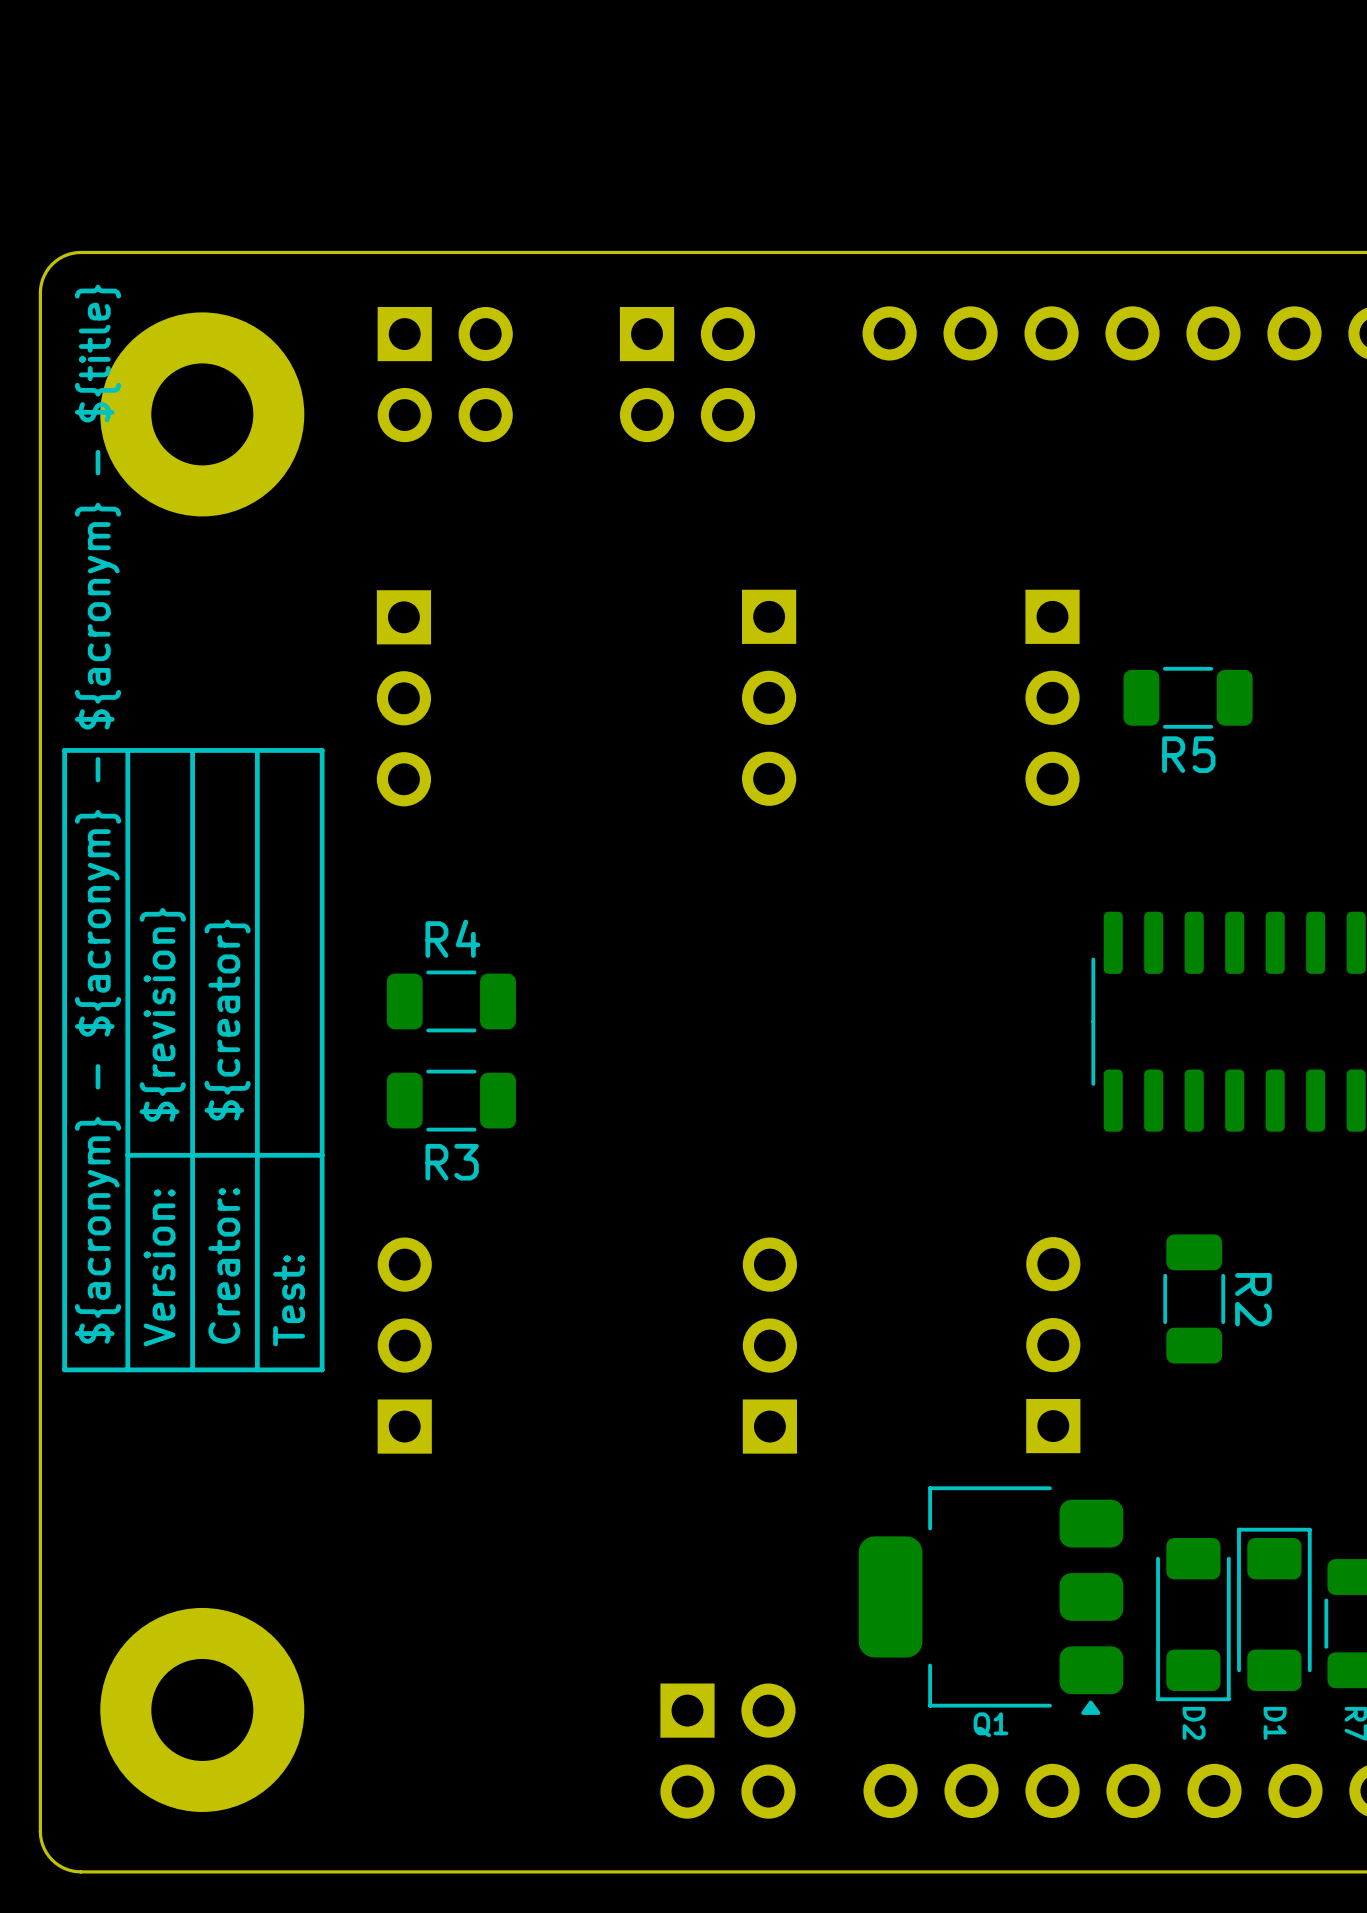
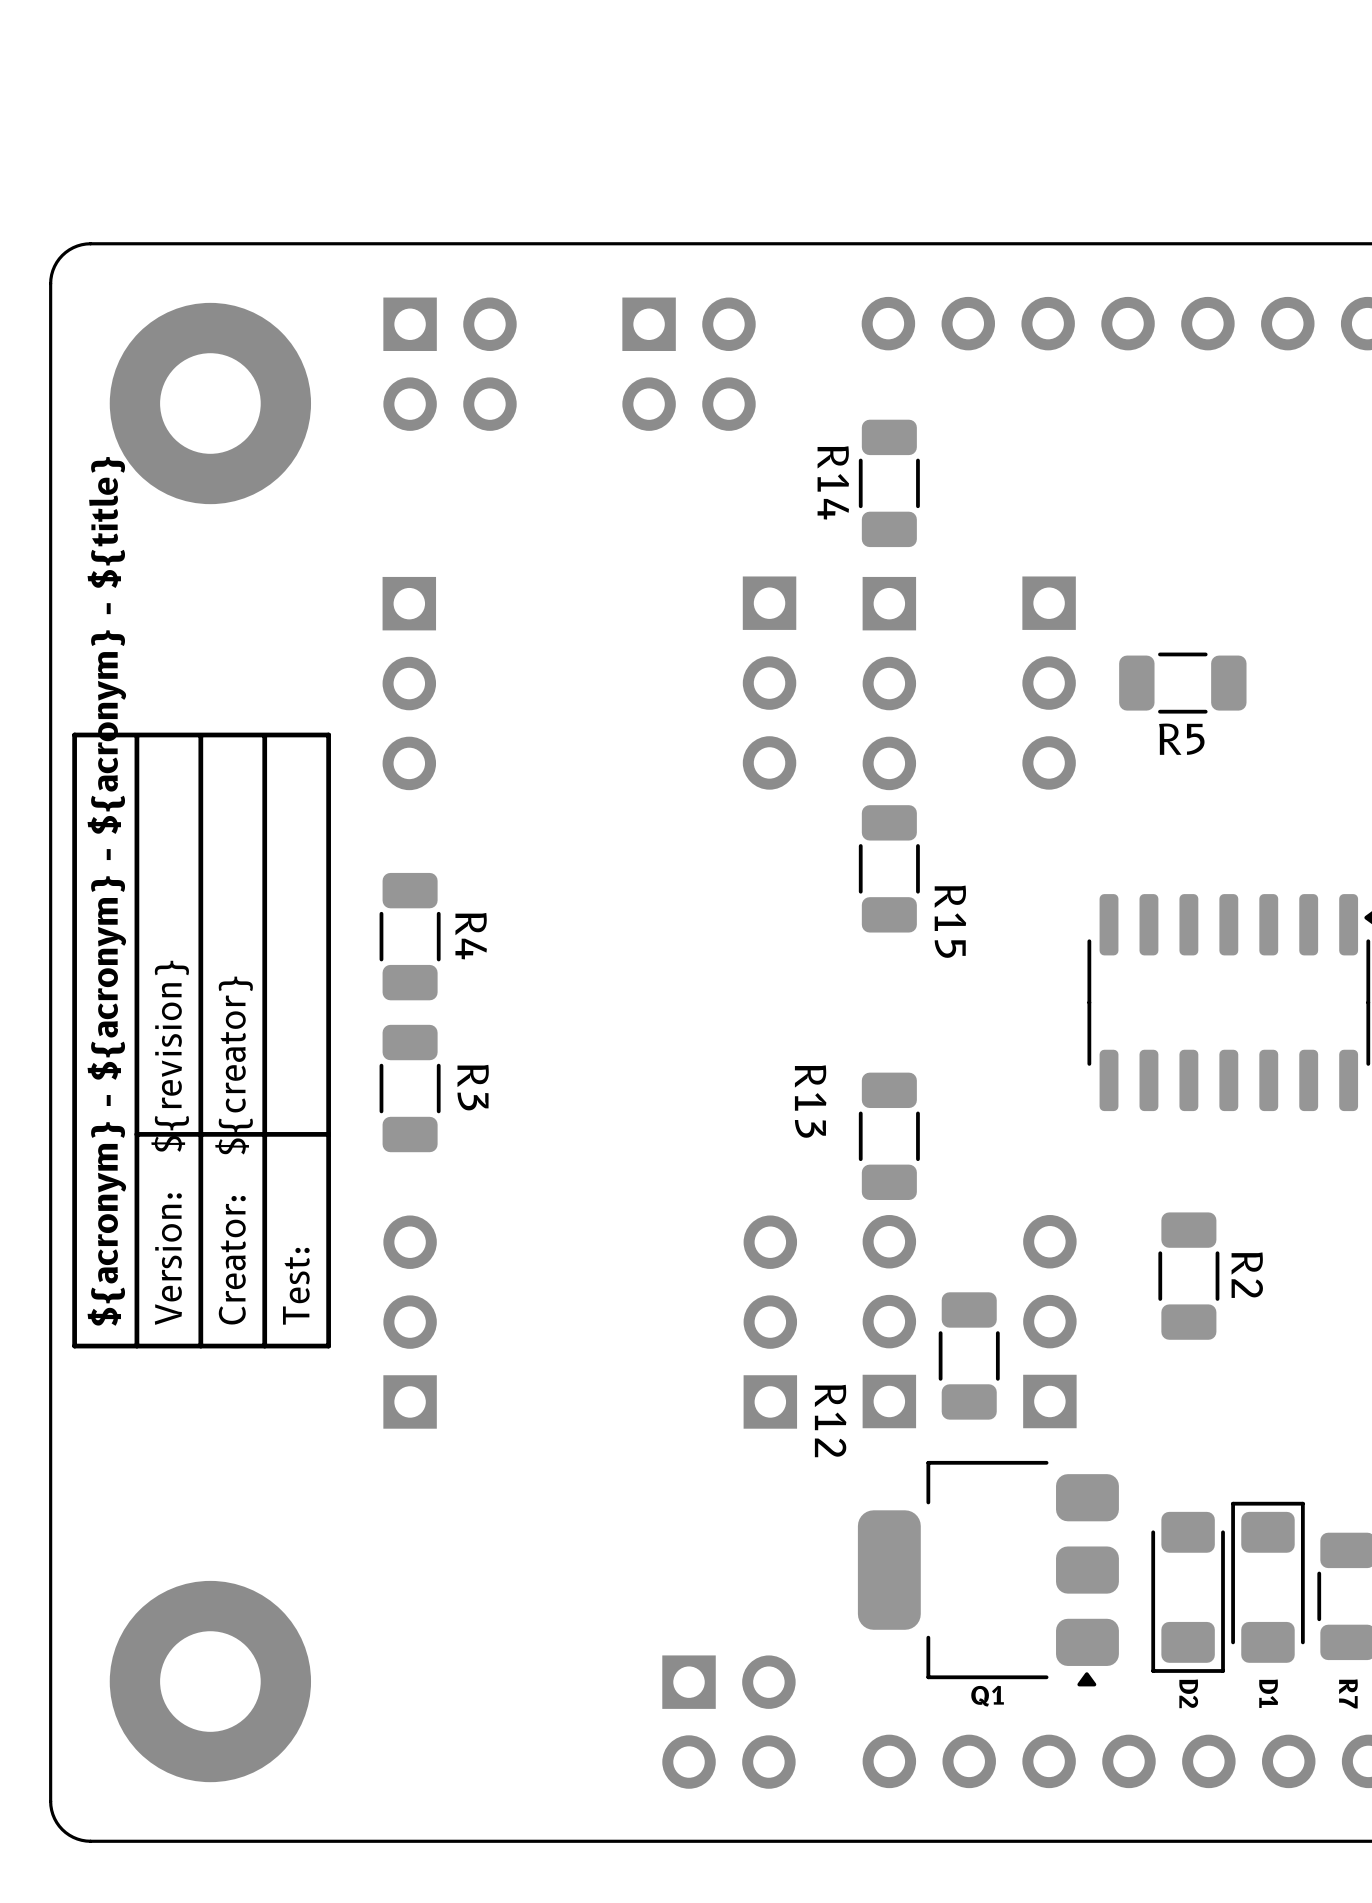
R14: none -> (889, 483)
part: none -> (889, 683)
R15: none -> (889, 868)
R4 rotation: 0° (451, 1001) -> 90° clockwise (410, 936)
R3 rotation: 0° (451, 1100) -> 90° clockwise (410, 1088)
R13: none -> (889, 1136)
R3 name position: R3 (452, 1162) -> R3 (473, 1087)
part: none -> (889, 1321)
R12: none -> (969, 1355)

